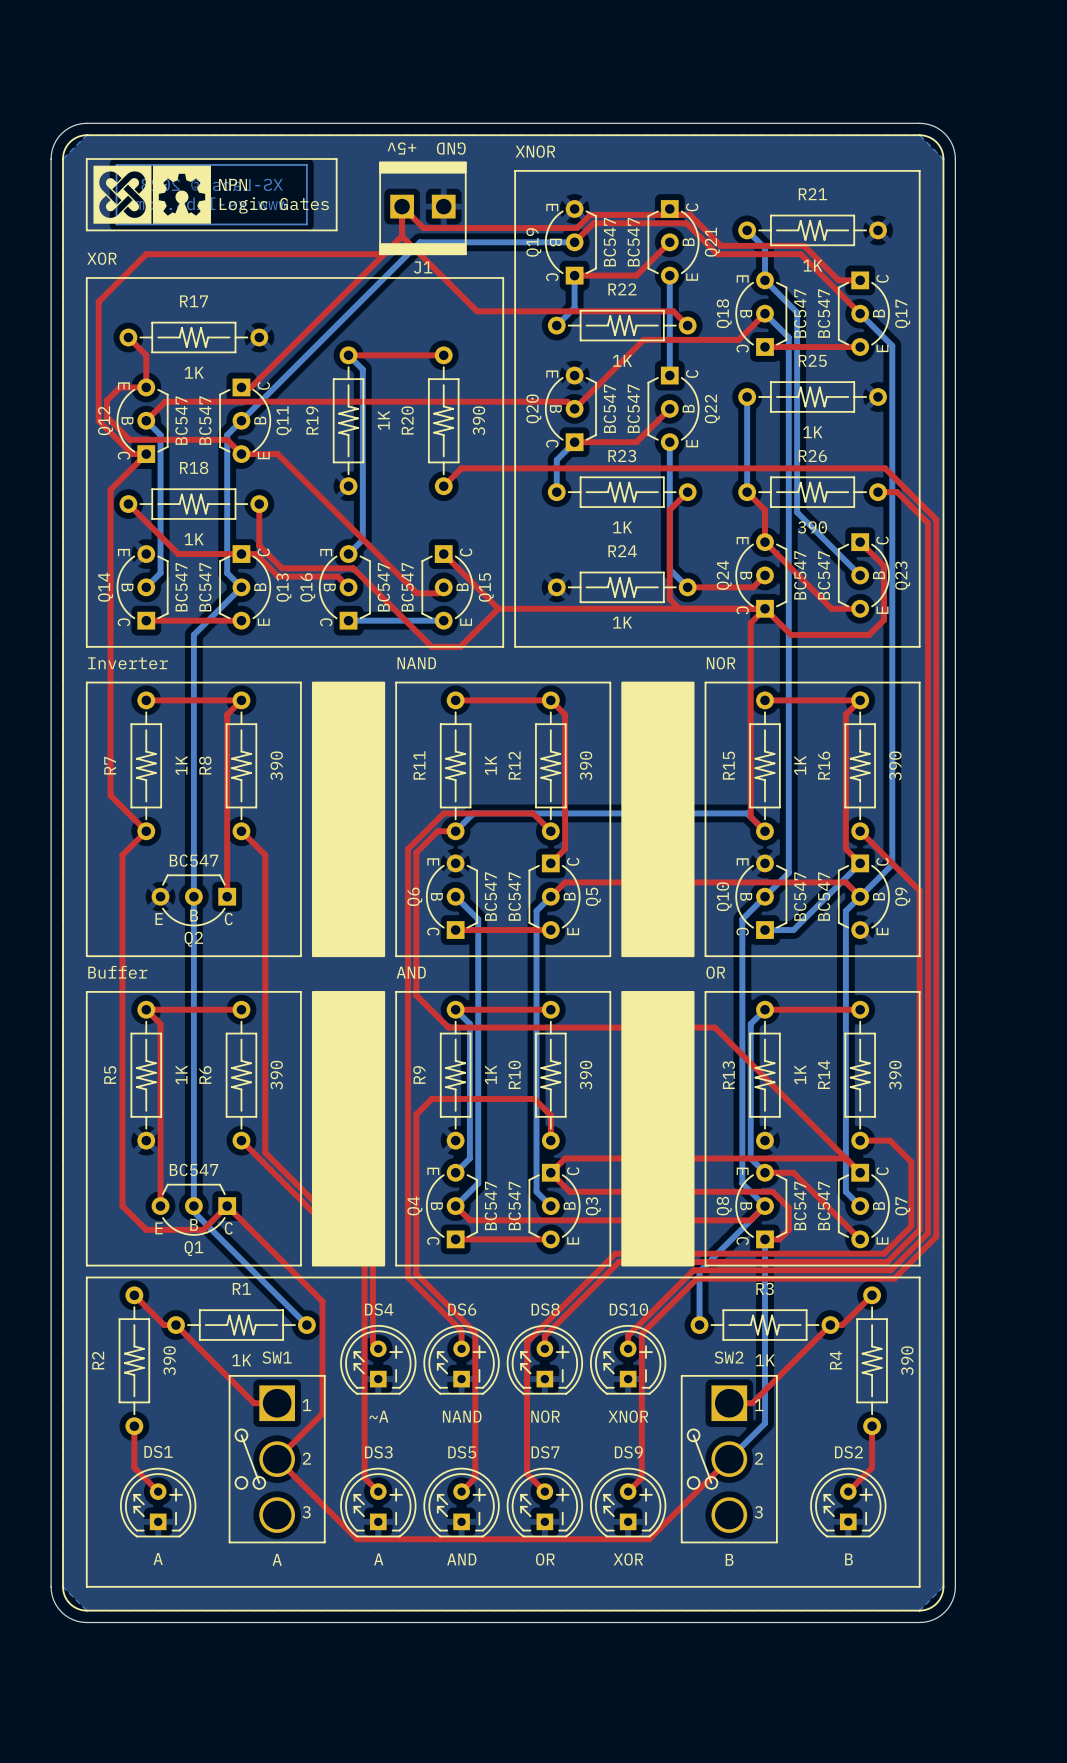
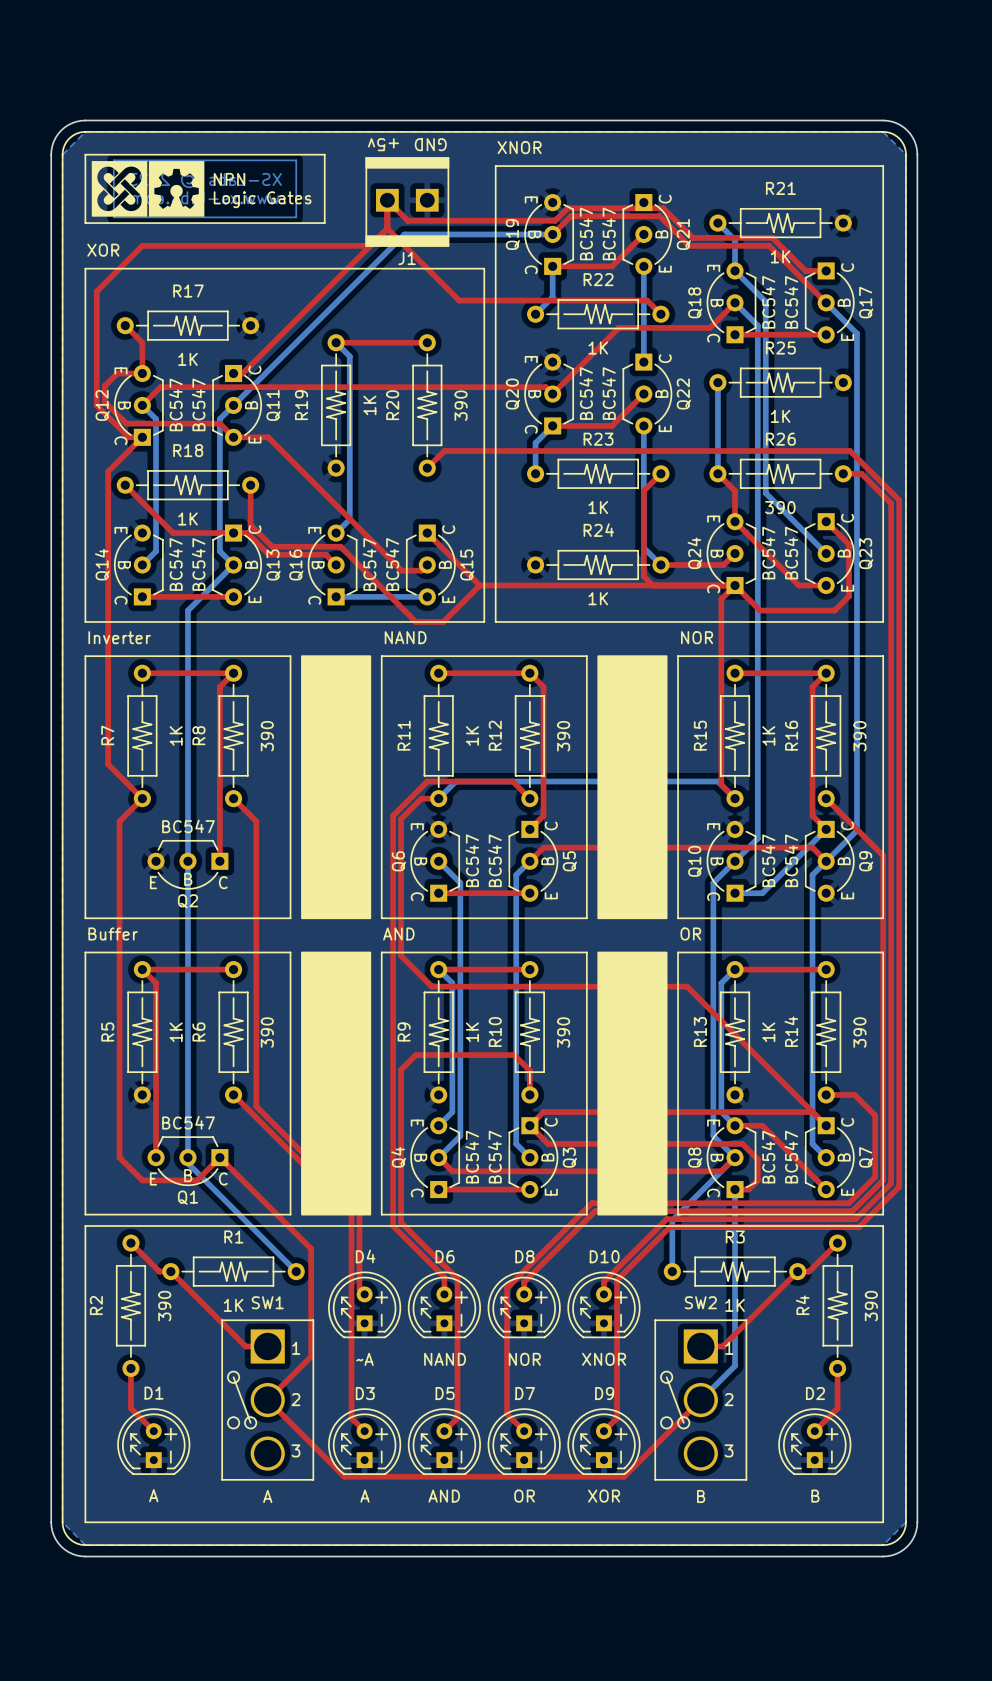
DS4 name: DS4 (379, 1309) -> D4 (365, 1256)
DS6 name: DS6 (462, 1309) -> D6 (445, 1256)
DS8 name: DS8 (545, 1309) -> D8 (524, 1256)
DS10 name: DS10 (628, 1309) -> D10 (604, 1256)
DS1 name: DS1 (158, 1451) -> D1 (154, 1393)
DS3 name: DS3 (378, 1452) -> D3 (365, 1393)
DS5 name: DS5 (462, 1452) -> D5 (445, 1393)
DS7 name: DS7 (545, 1452) -> D7 (525, 1393)
DS9 name: DS9 (628, 1452) -> D9 (604, 1393)
DS2 name: DS2 (848, 1452) -> D2 (815, 1393)

